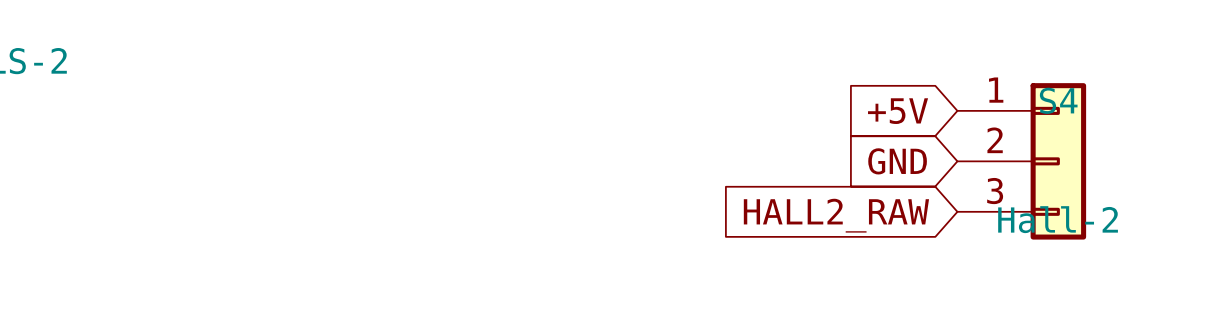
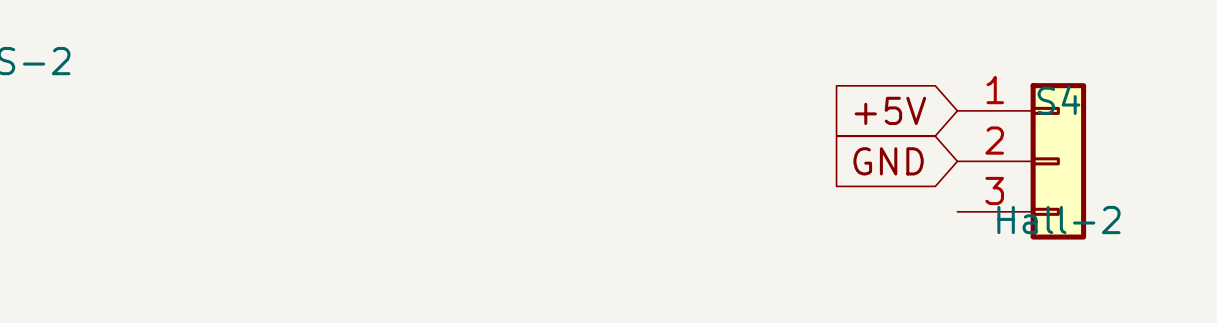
global label: HALL2_RAW (836, 215) -> none

